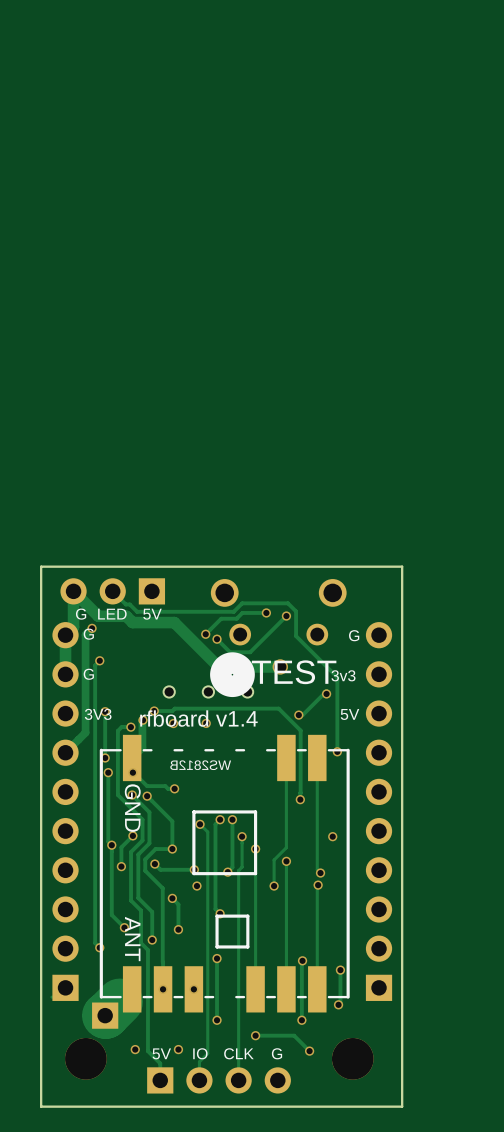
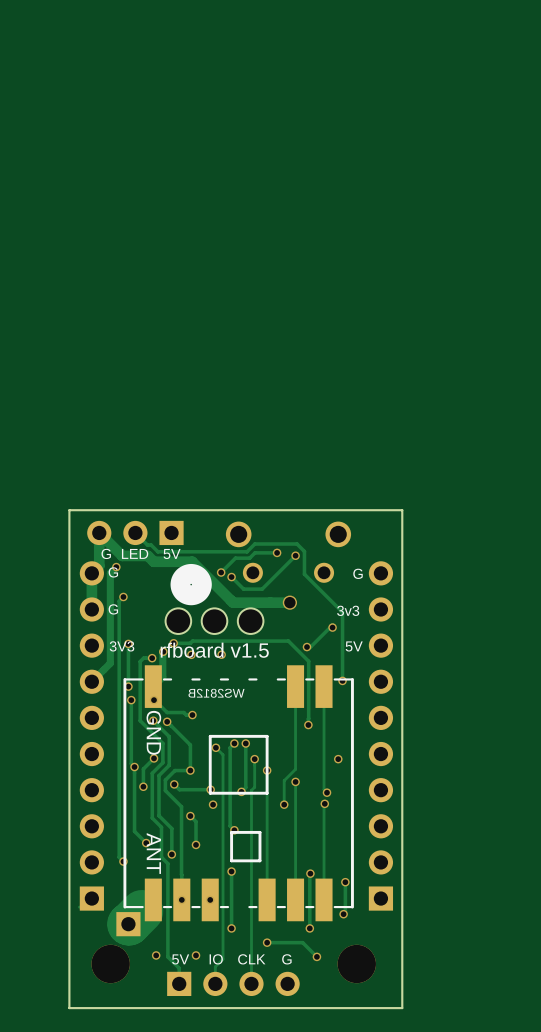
text: TEST (294, 672) -> none
drawing position: (232, 674) -> (191, 584)
part footprint: [163, 686, 254, 698] -> [165, 608, 264, 634]
text: rfboard v1.4 (198, 718) -> rfboard v1.5 (214, 650)

